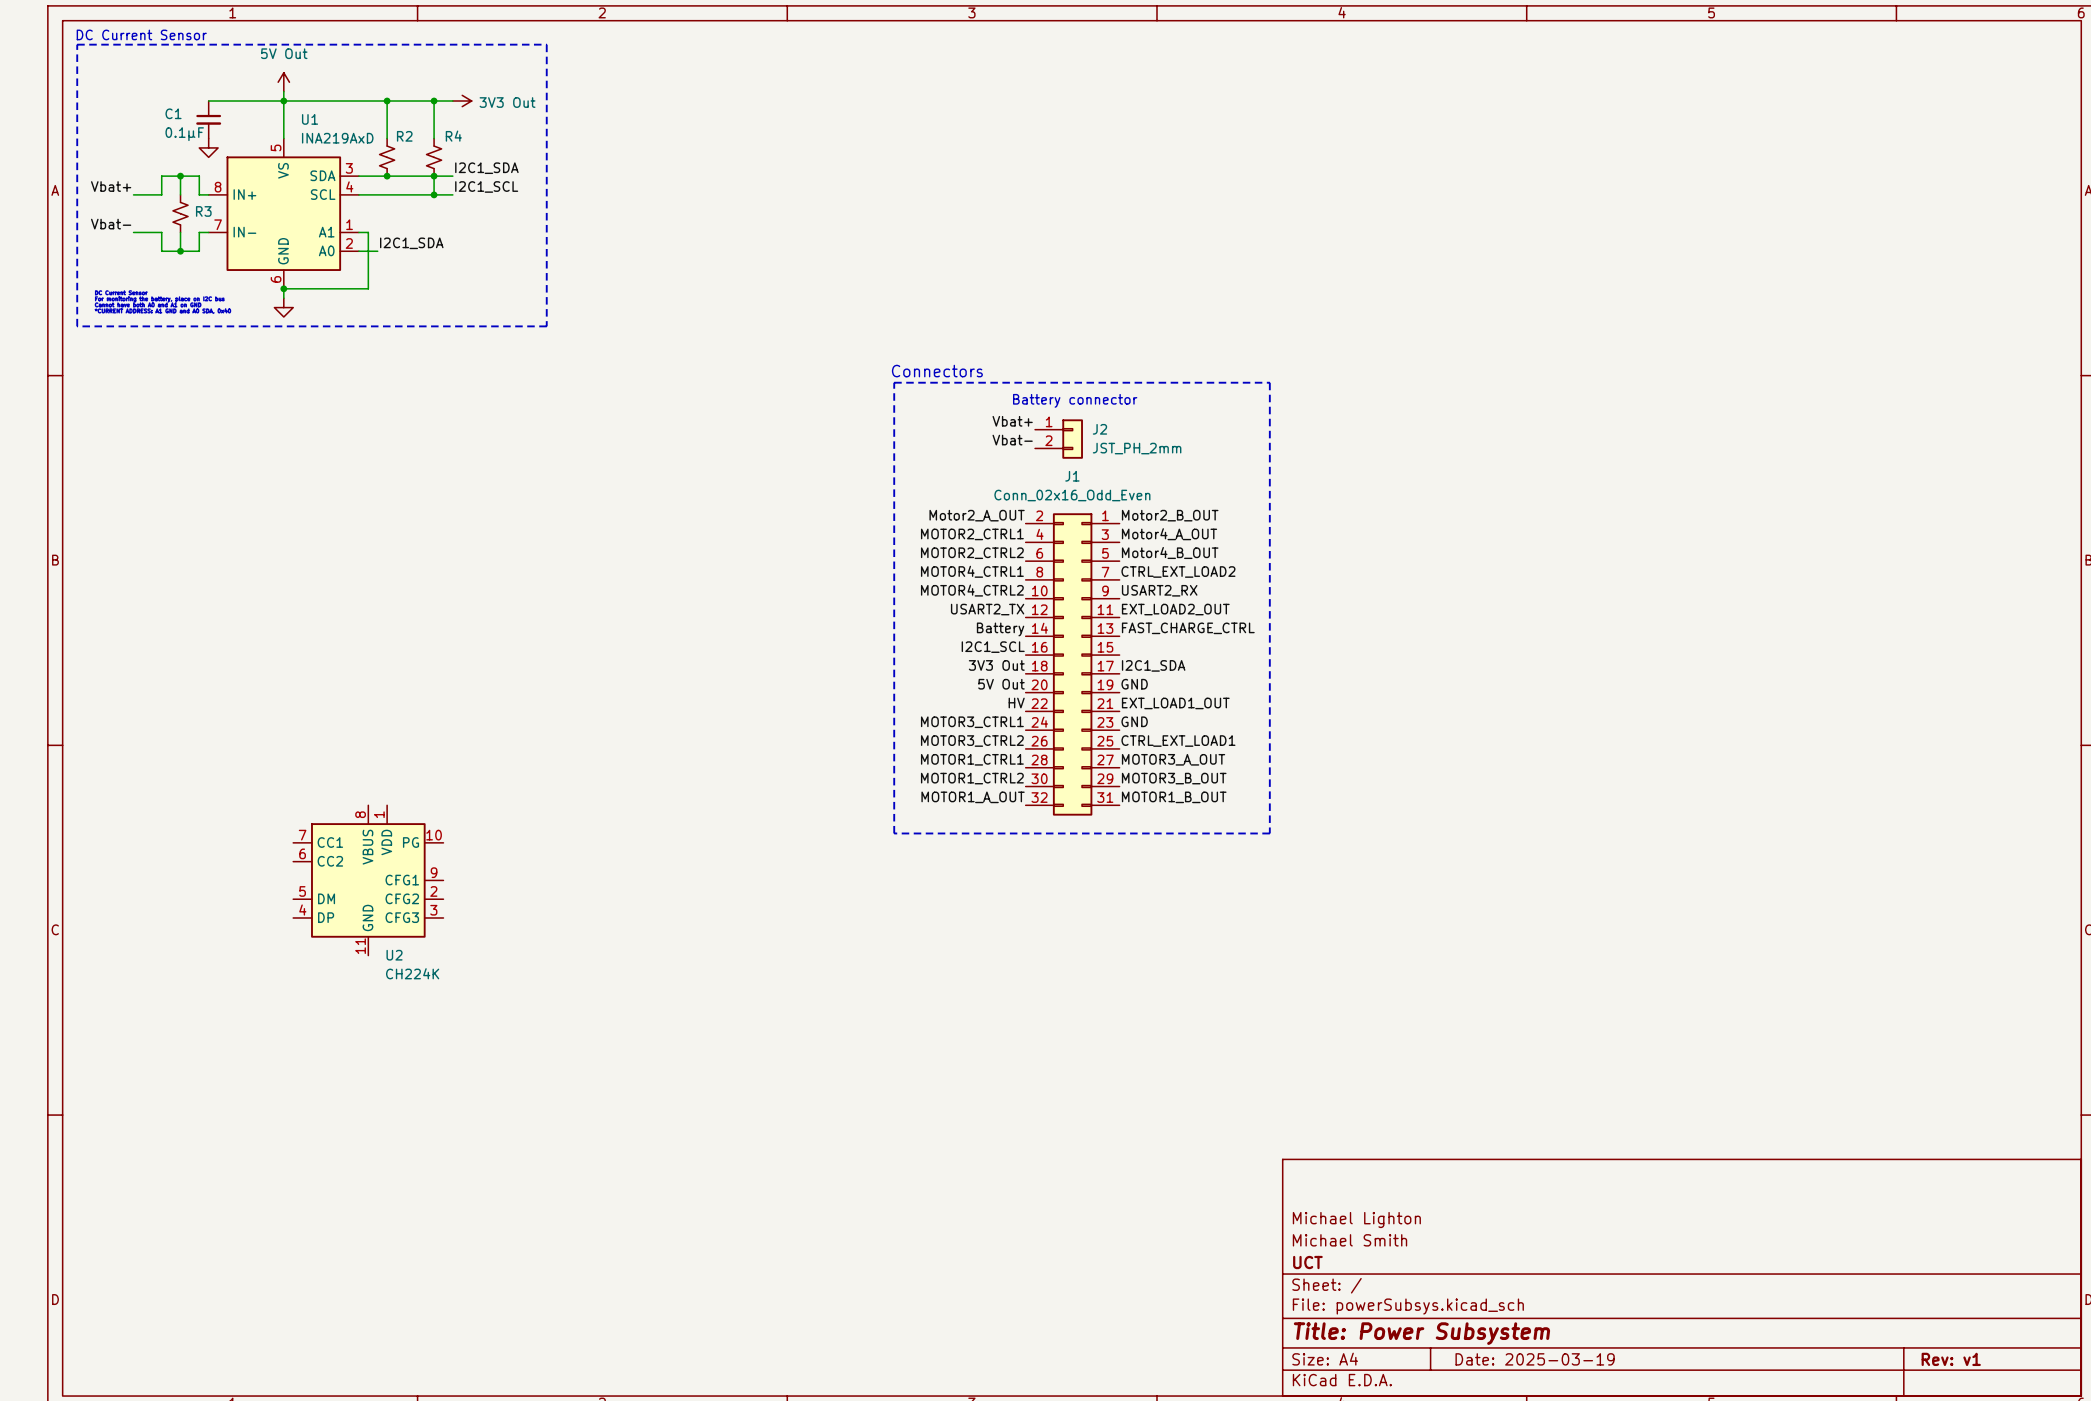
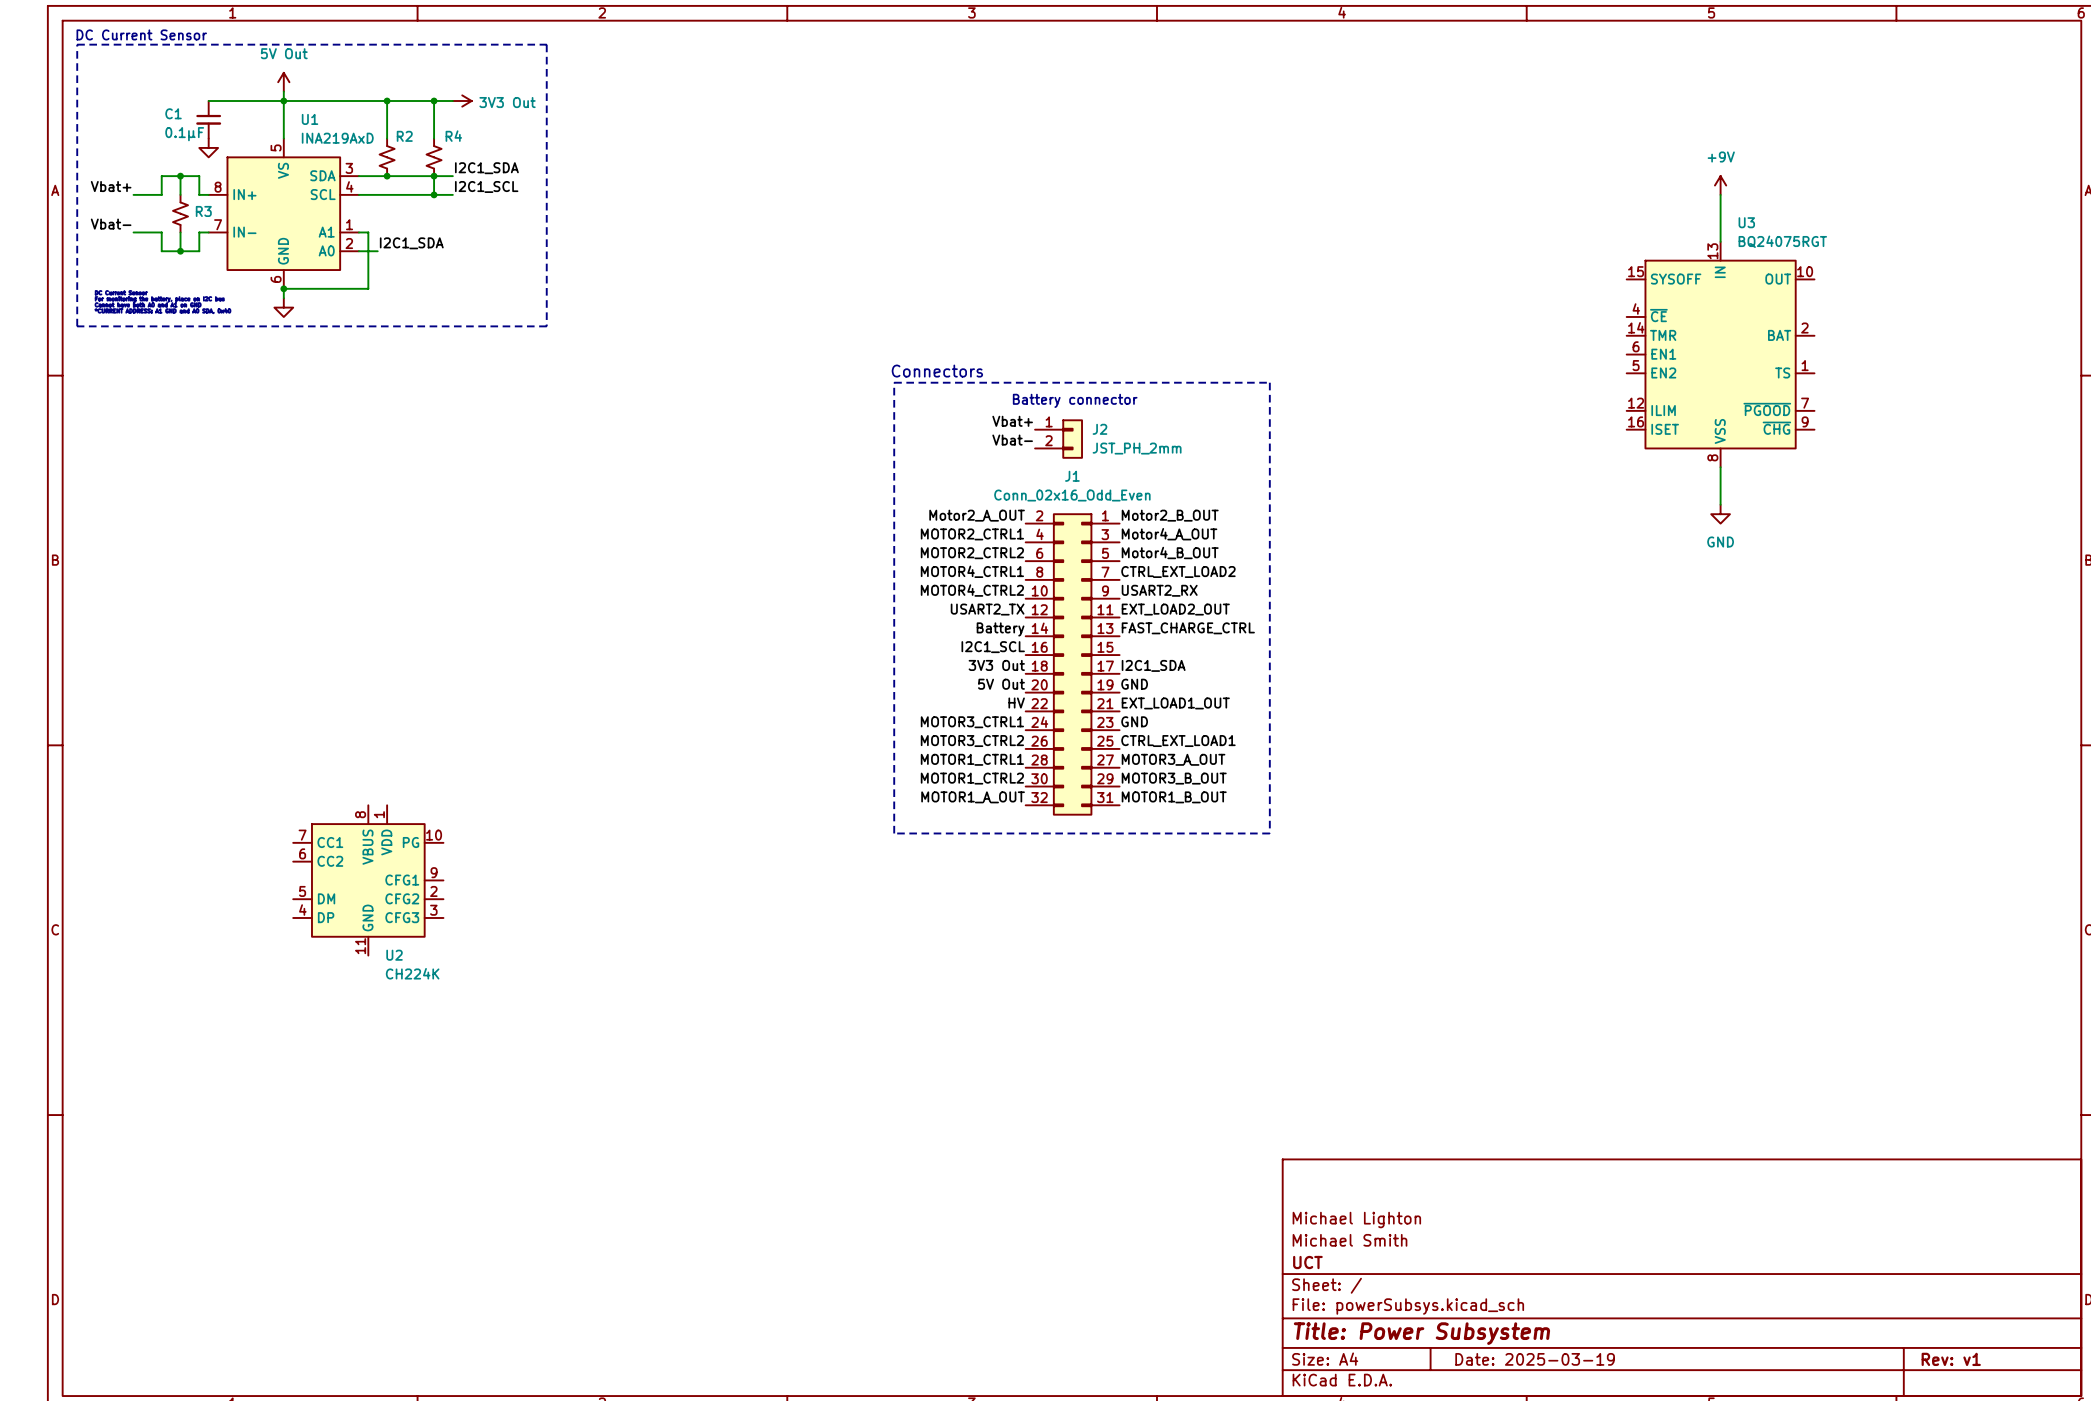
power symbol: none -> +9V (1720, 185)
wire: none -> (1720, 194) (1720, 241)
U3: none -> BQ24075RGT (1720, 354)
wire: none -> (1720, 467) (1720, 504)
power symbol: none -> GND (1720, 514)

